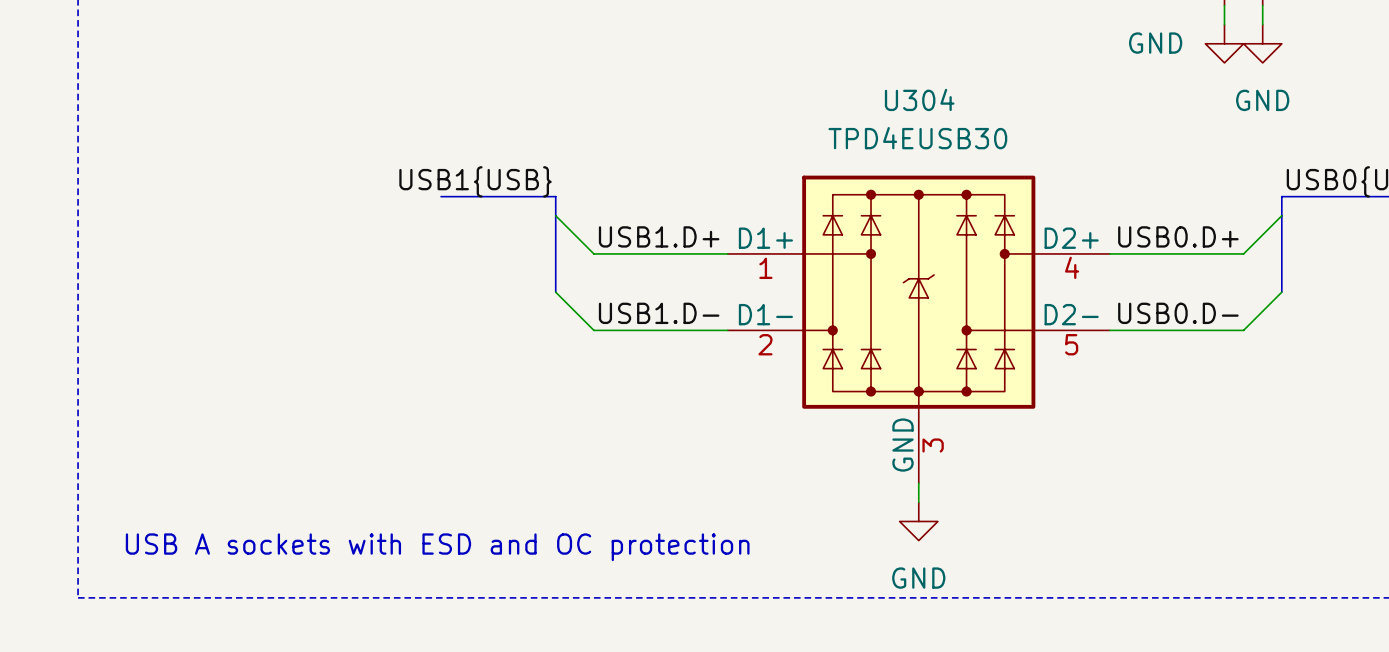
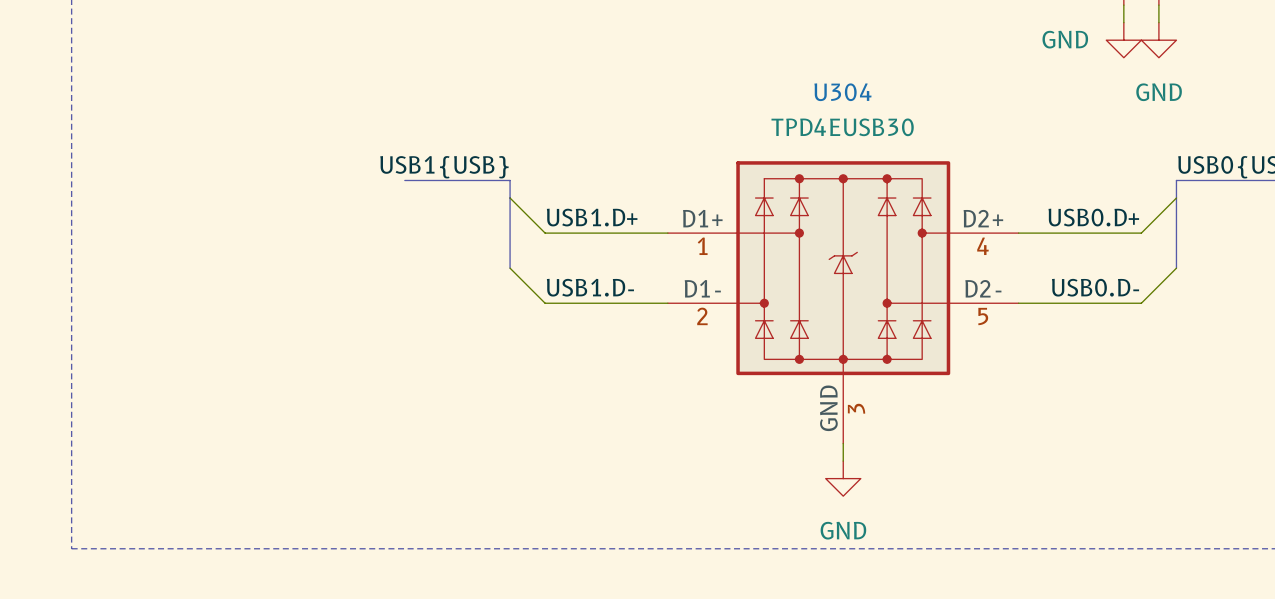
text: USB A sockets with ESD and OC protection (437, 547) -> none

